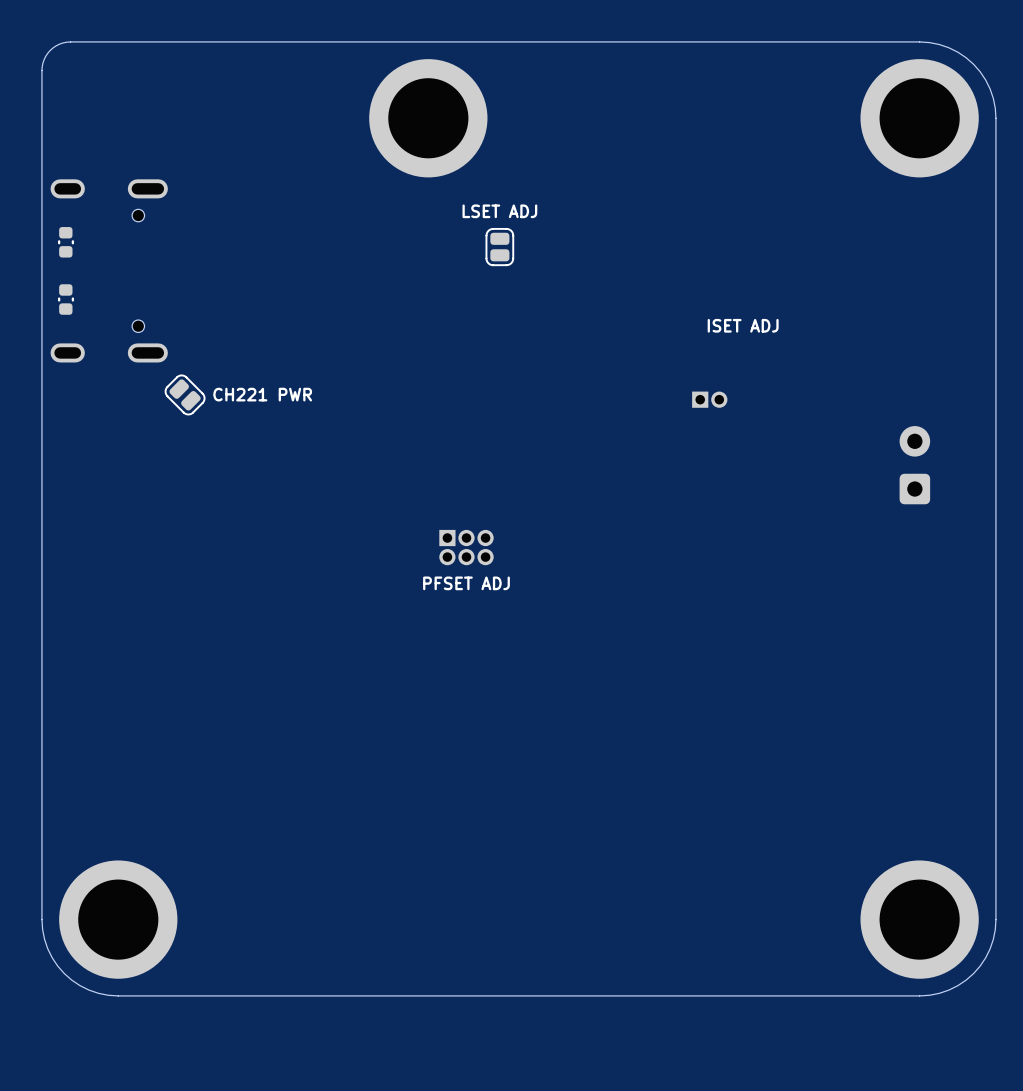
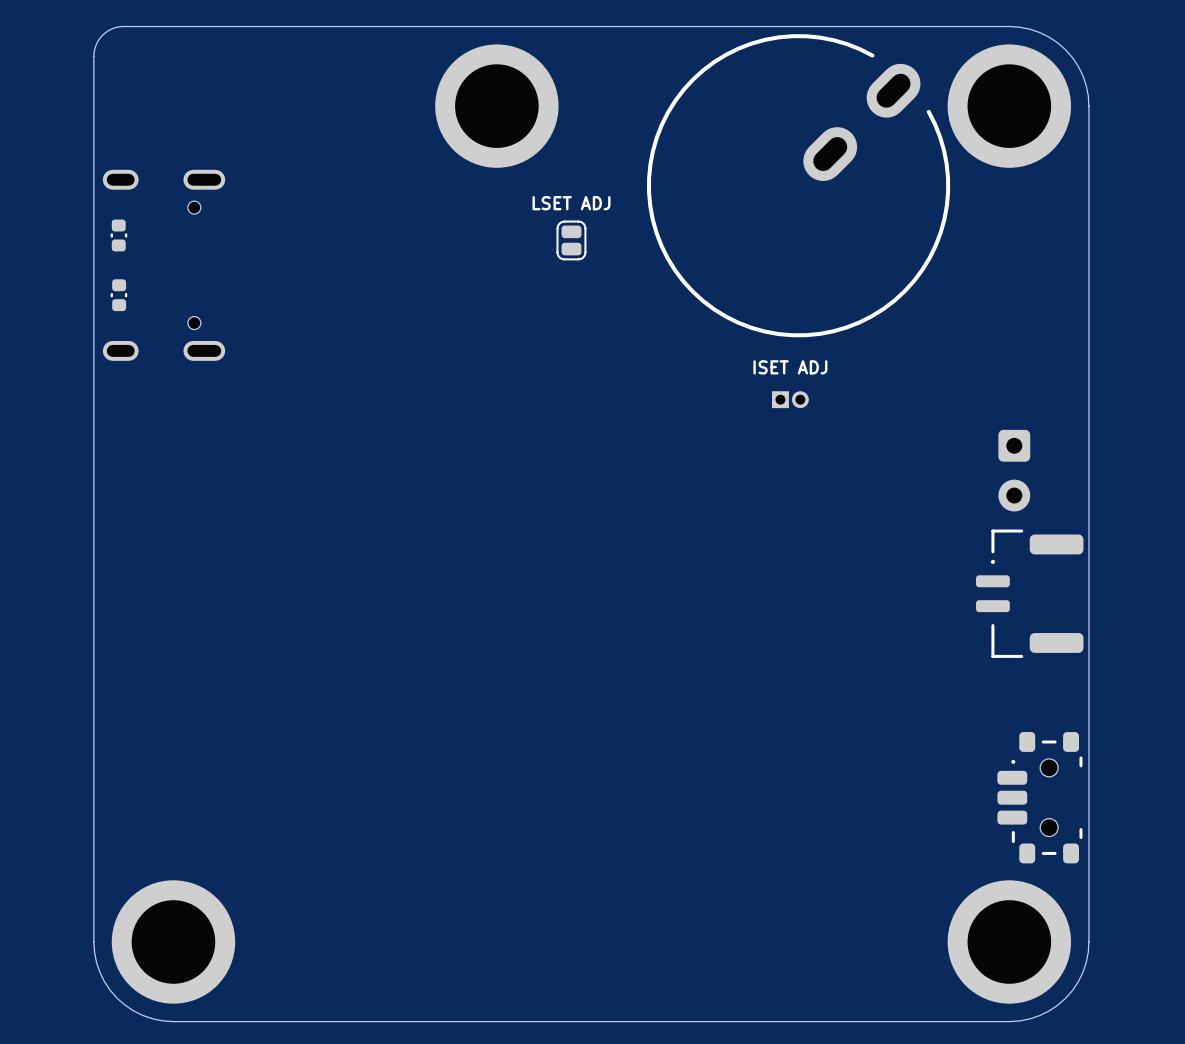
part: none -> (798, 185)
text position: ISET ADJ (743, 325) -> ISET ADJ (790, 367)
part: (185, 394) -> none
text: CH221 PWR (262, 394) -> none
part rotation: 0° (914, 465) -> 180° (1014, 470)
part: (466, 547) -> none
text: PFSET ADJ (466, 583) -> none
part: none -> (1029, 593)
part: none -> (1039, 797)

